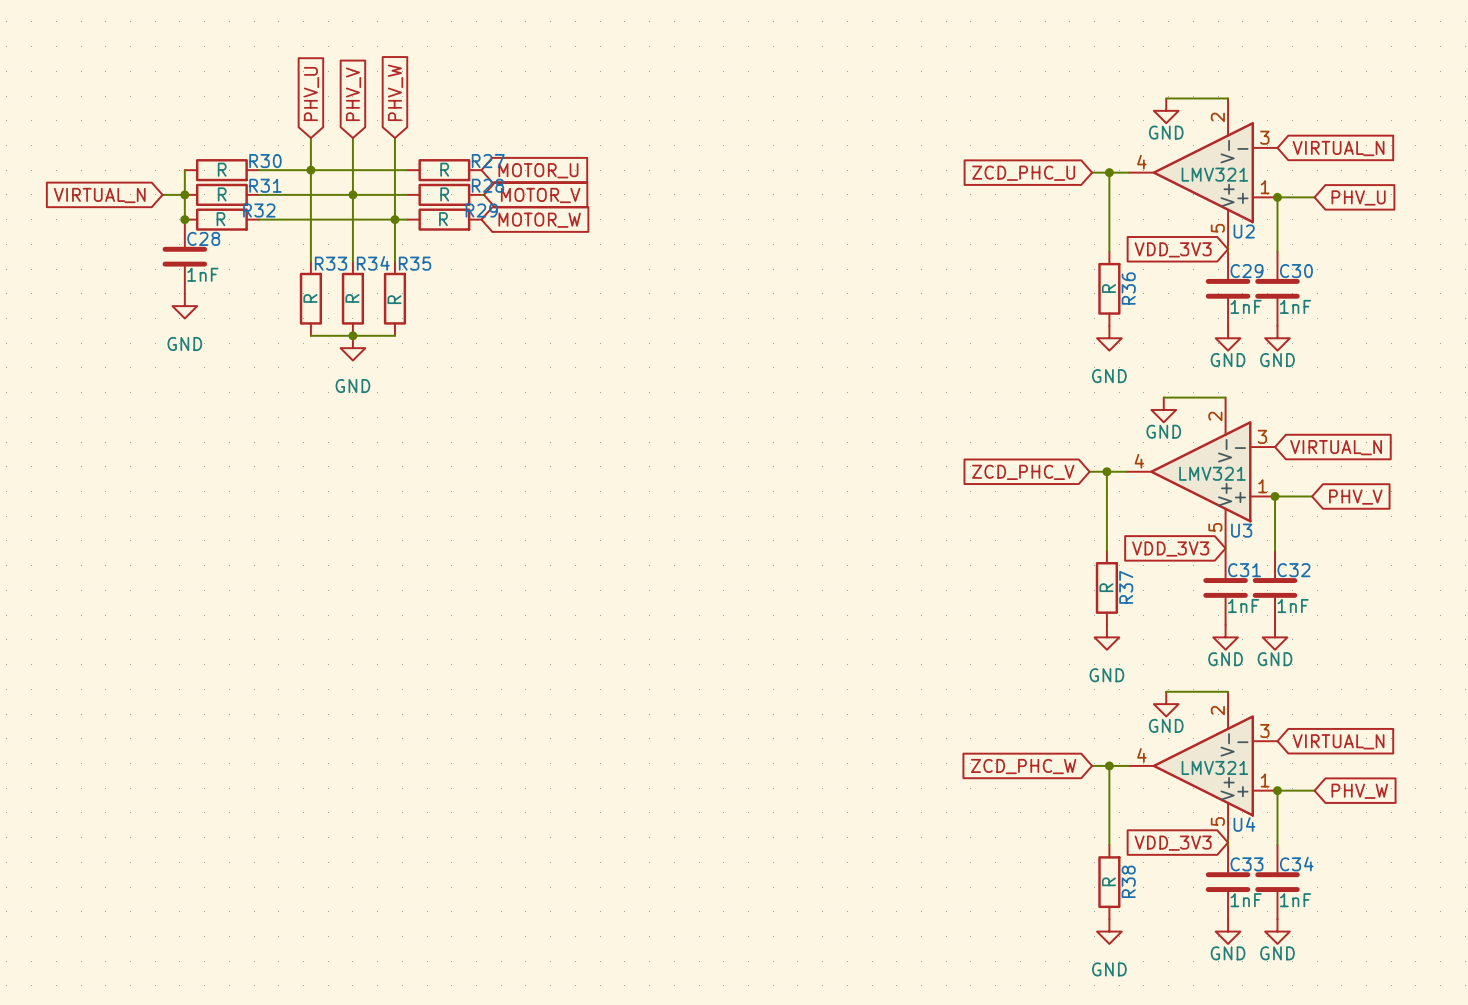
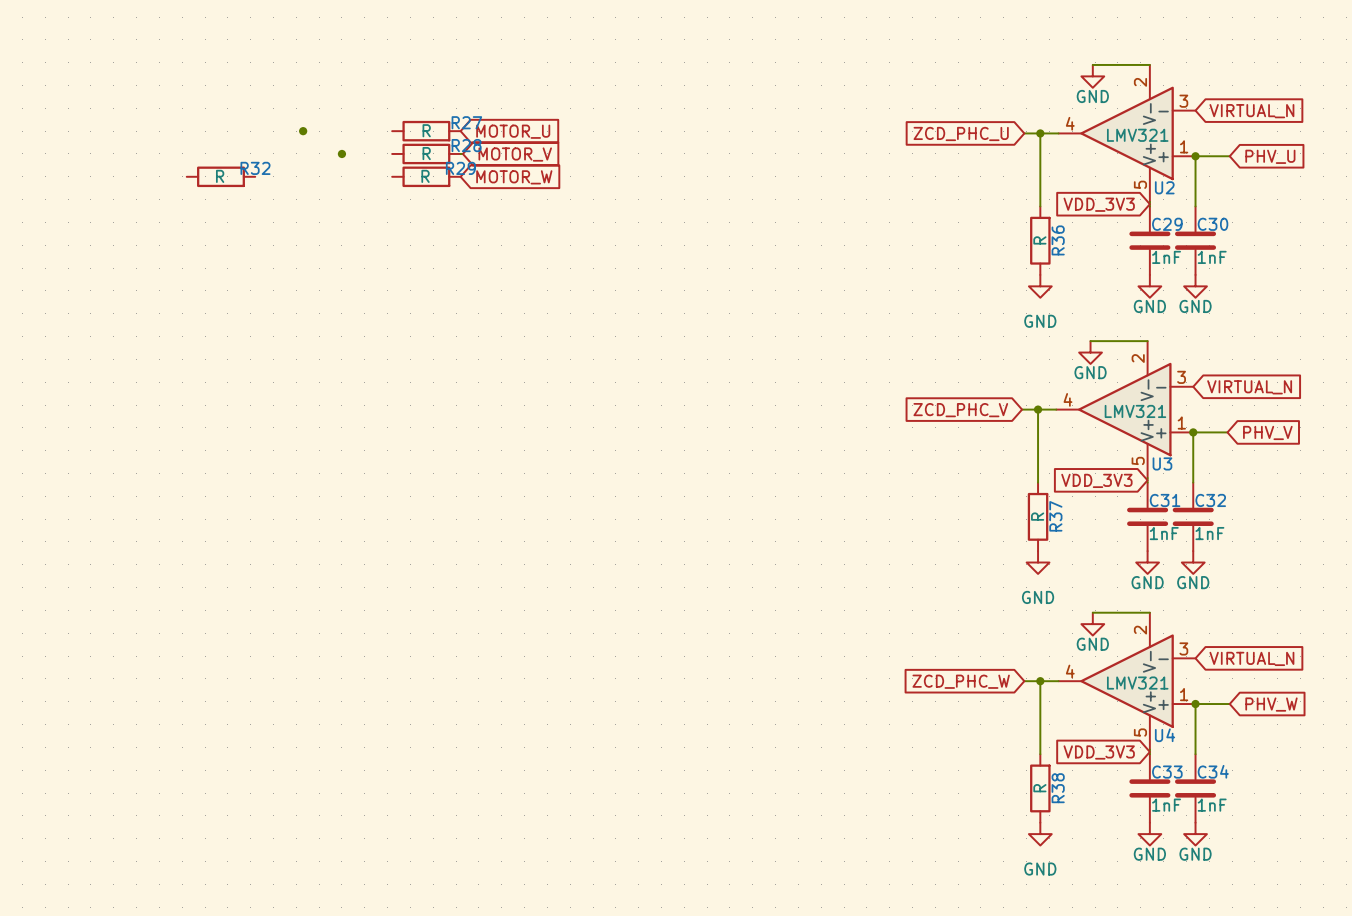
global label: PHV_W (395, 92) -> none
global label: PHV_U (311, 94) -> none
global label: PHV_V (353, 94) -> none
wire: (310, 138) (310, 261) -> none
wire: (352, 138) (352, 261) -> none
wire: (394, 138) (394, 261) -> none
wire: (184, 170) (184, 219) -> none
R30: R (221, 170) -> none
wire: (258, 170) (407, 170) -> none
wire: (162, 194) (184, 194) -> none
junction: (184, 194) -> none
R31: R (221, 194) -> none
wire: (258, 194) (407, 194) -> none
global label: VIRTUAL_N (99, 195) -> none
junction: (184, 219) -> none
wire: (258, 219) (407, 219) -> none
junction: (394, 219) -> none
C28: 1nF (184, 256) -> none
R33: R (310, 298) -> none
R34: R (352, 298) -> none
R35: R (394, 298) -> none
power symbol: GND (184, 306) -> none
wire: (310, 335) (394, 335) -> none
junction: (352, 335) -> none
power symbol: GND (352, 348) -> none

